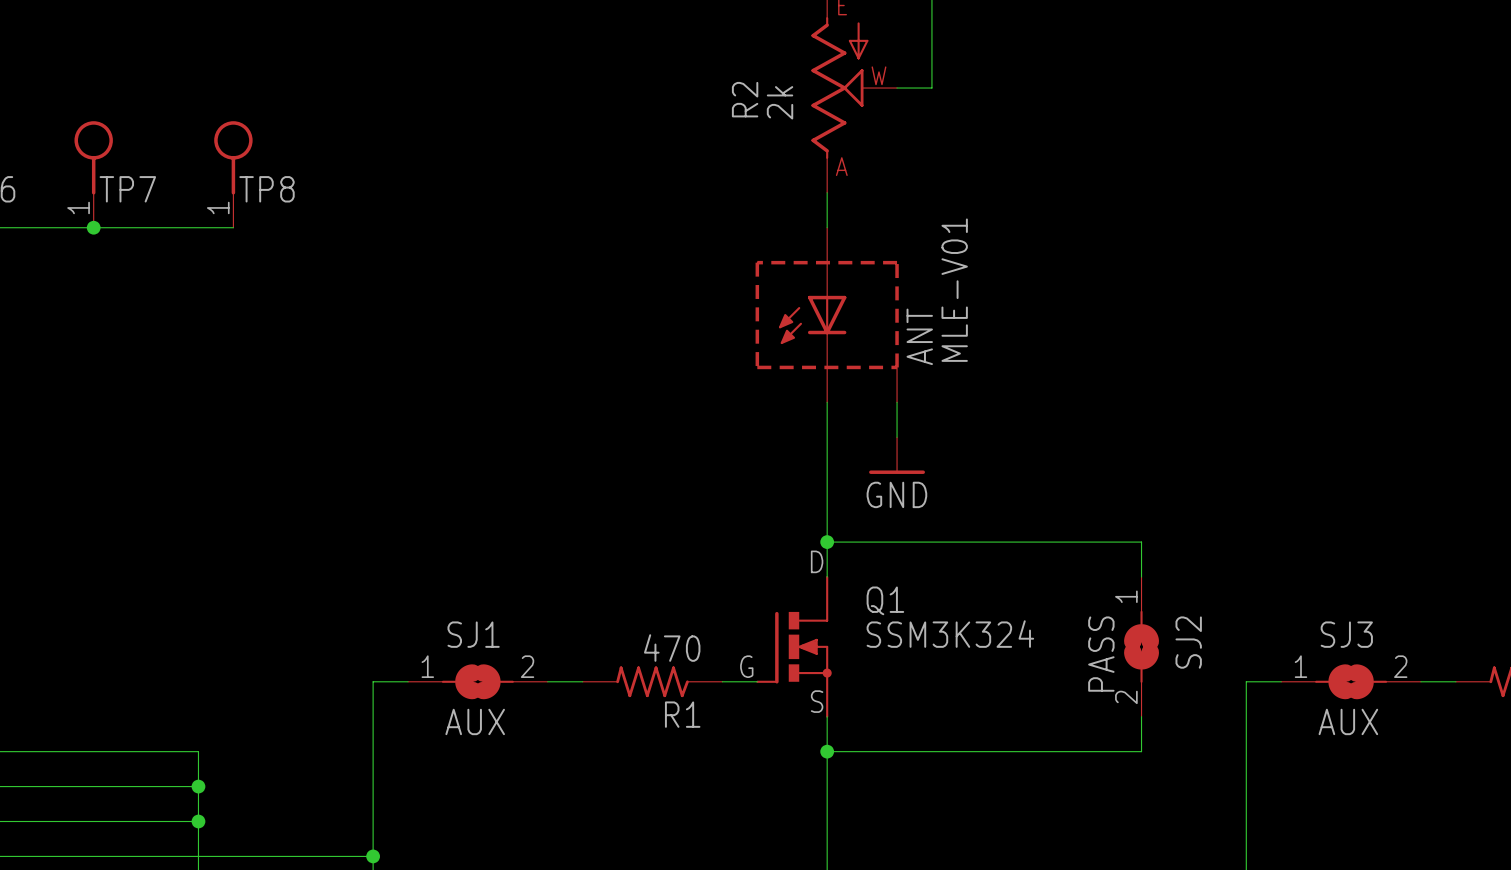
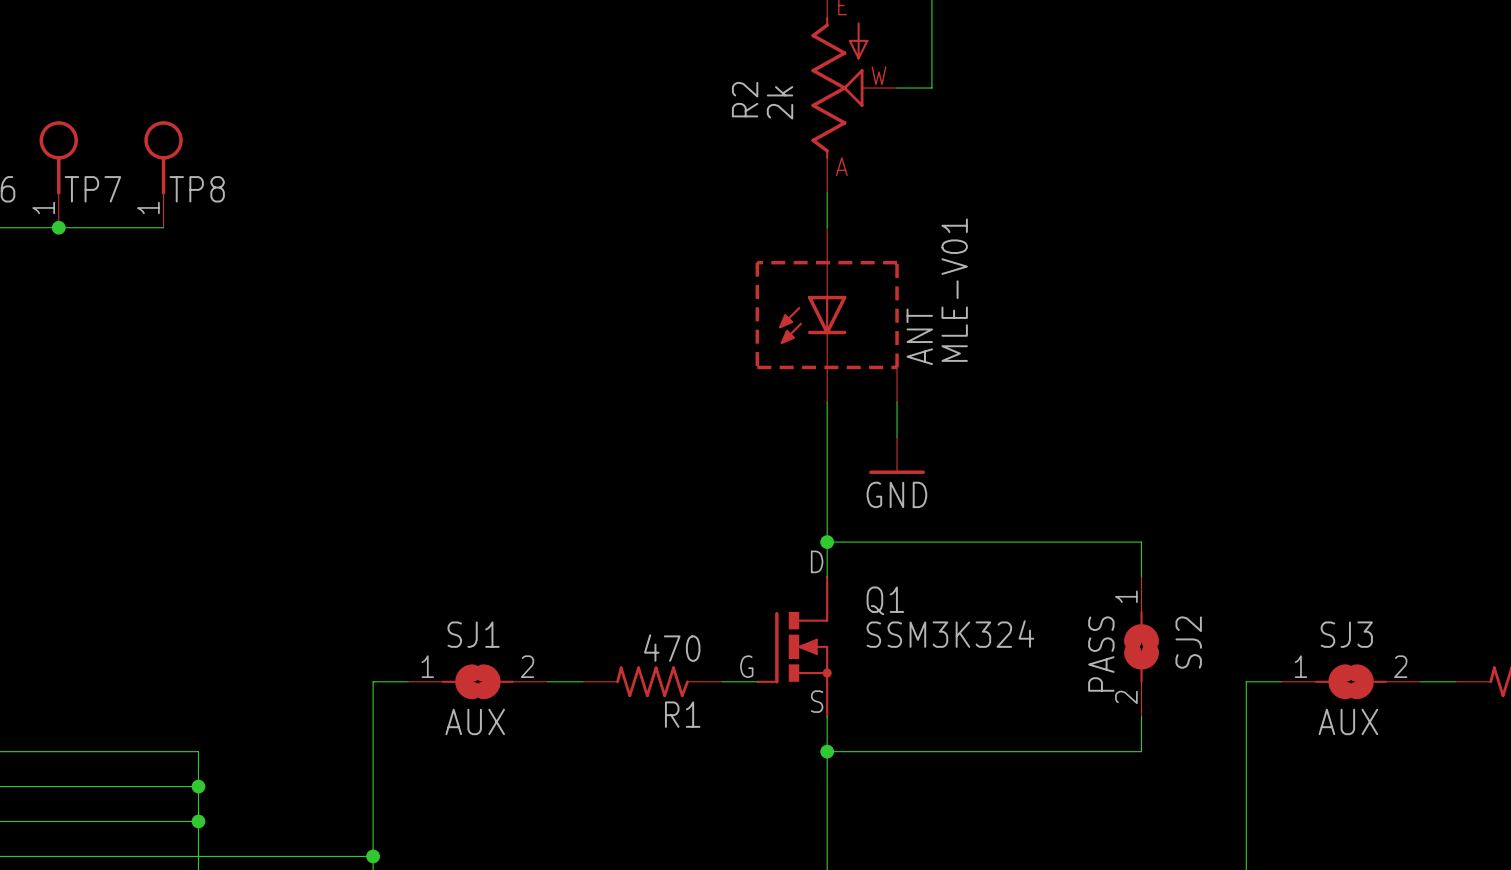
TP7 position: (93, 174) -> (58, 174)
TP8 position: (233, 174) -> (163, 174)
junction position: (93, 227) -> (58, 227)
wire: (163, 227) (233, 227) -> none

